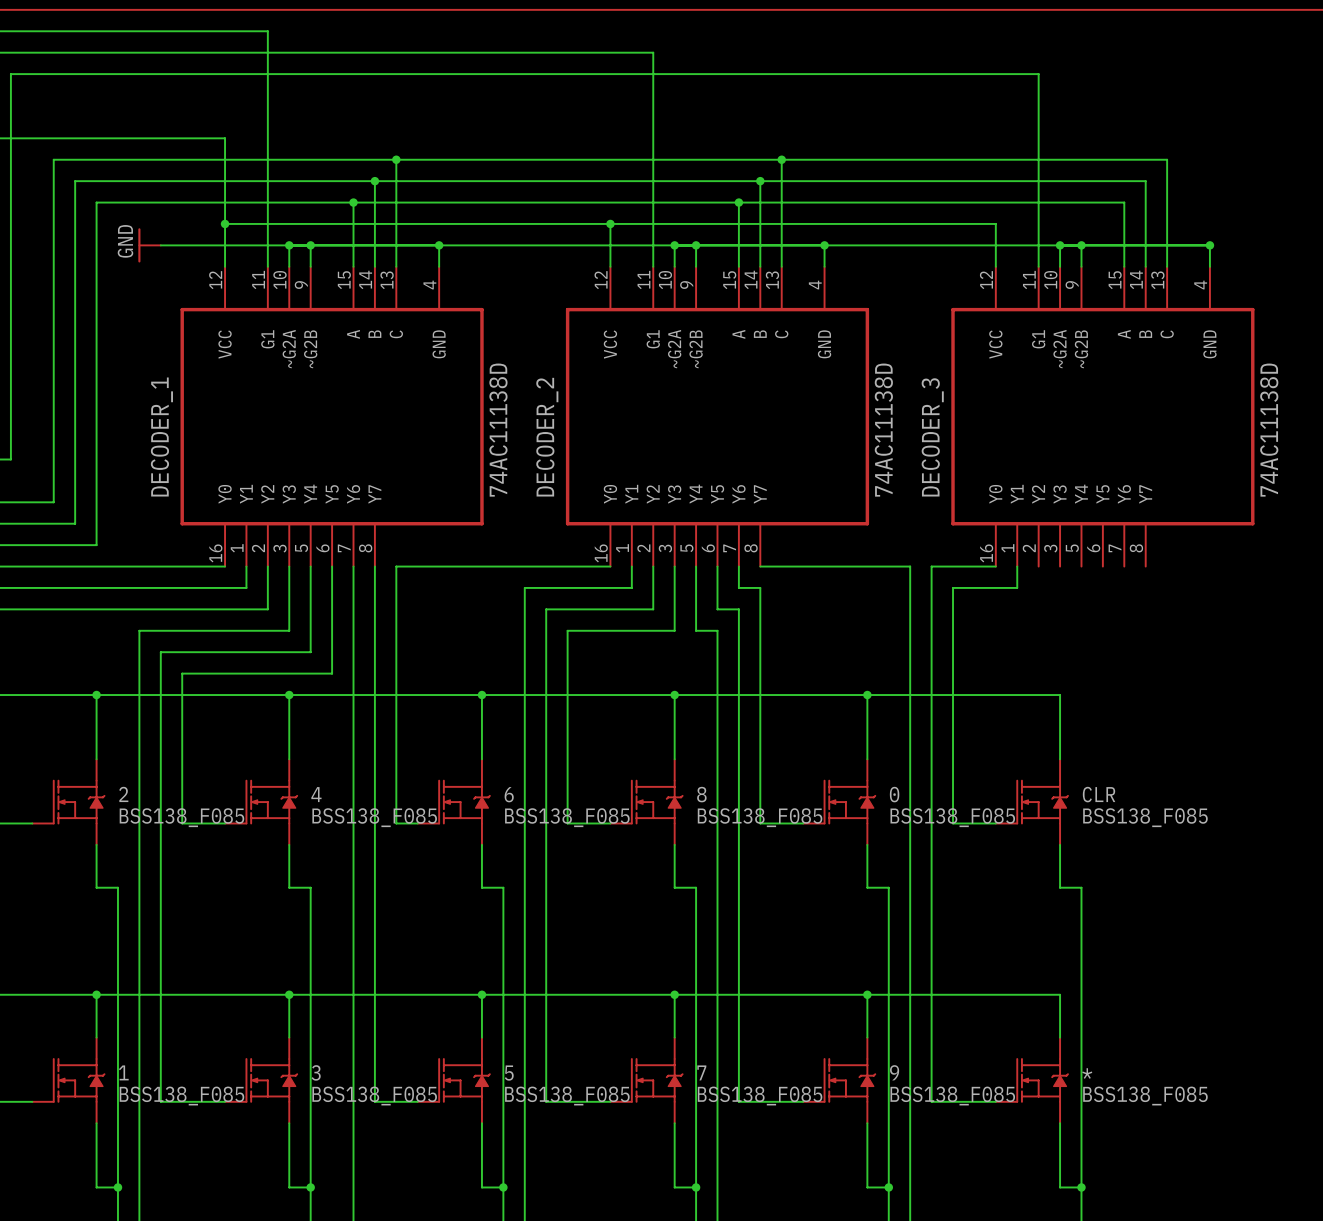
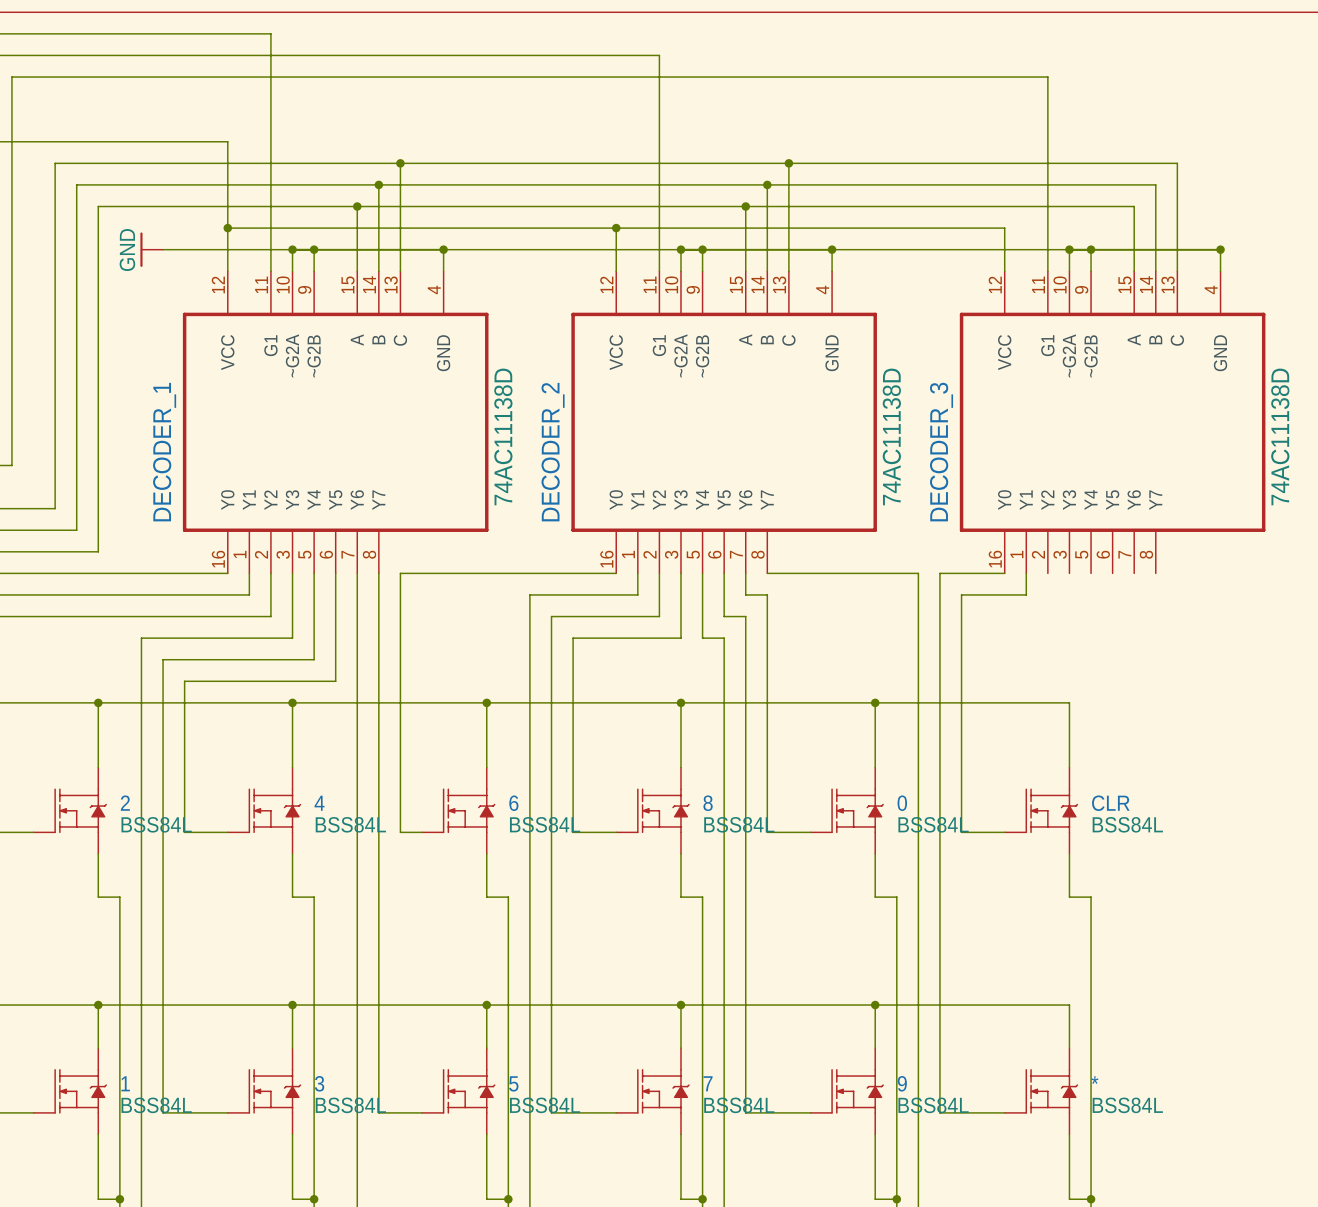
2 value: BSS138_F085 (181, 817) -> BSS84L (156, 824)
4 value: BSS138_F085 (374, 817) -> BSS84L (350, 824)
6 value: BSS138_F085 (567, 817) -> BSS84L (545, 824)
8 value: BSS138_F085 (760, 817) -> BSS84L (739, 824)
0 value: BSS138_F085 (952, 817) -> BSS84L (933, 824)
CLR value: BSS138_F085 (1145, 817) -> BSS84L (1127, 824)
1 value: BSS138_F085 (181, 1096) -> BSS84L (156, 1105)
3 value: BSS138_F085 (374, 1096) -> BSS84L (350, 1105)
5 value: BSS138_F085 (567, 1096) -> BSS84L (545, 1105)
7 value: BSS138_F085 (760, 1096) -> BSS84L (739, 1105)
9 value: BSS138_F085 (952, 1096) -> BSS84L (933, 1105)
part value: BSS138_F085 (1145, 1096) -> BSS84L (1127, 1105)

